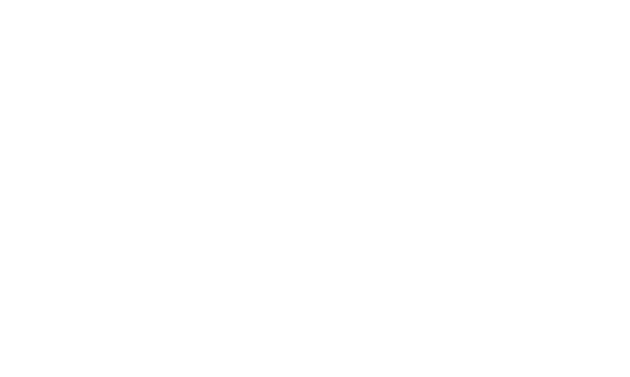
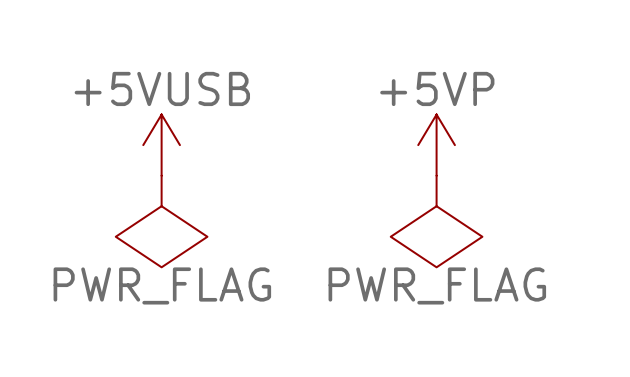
power symbol: none -> +5VUSB (161, 145)
power symbol: none -> +5VP (436, 145)
power symbol: none -> PWR_FLAG (161, 221)
power symbol: none -> PWR_FLAG (436, 221)

